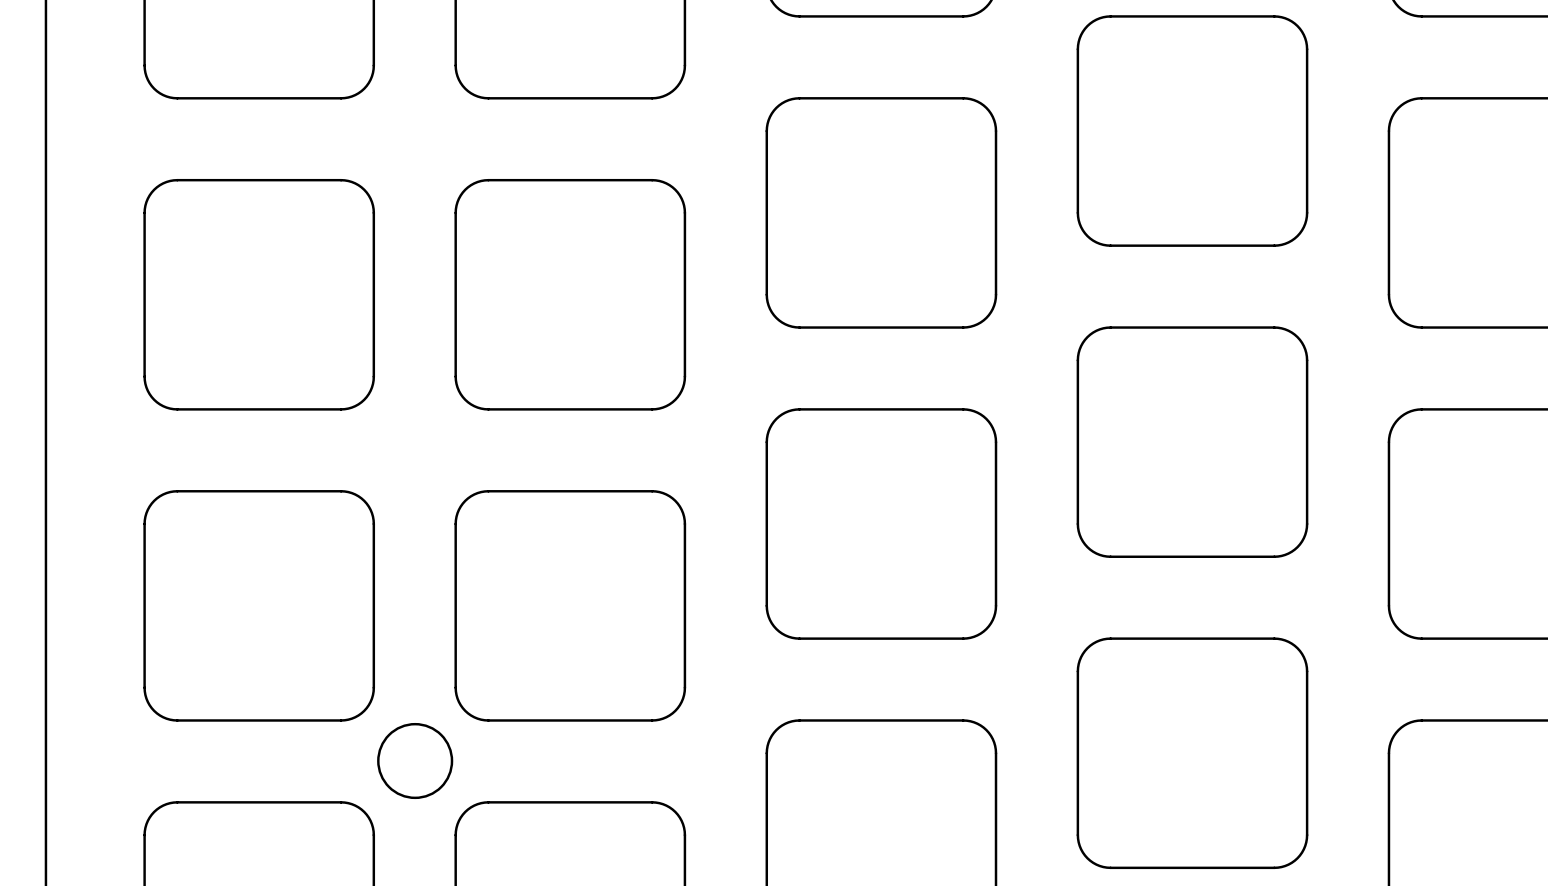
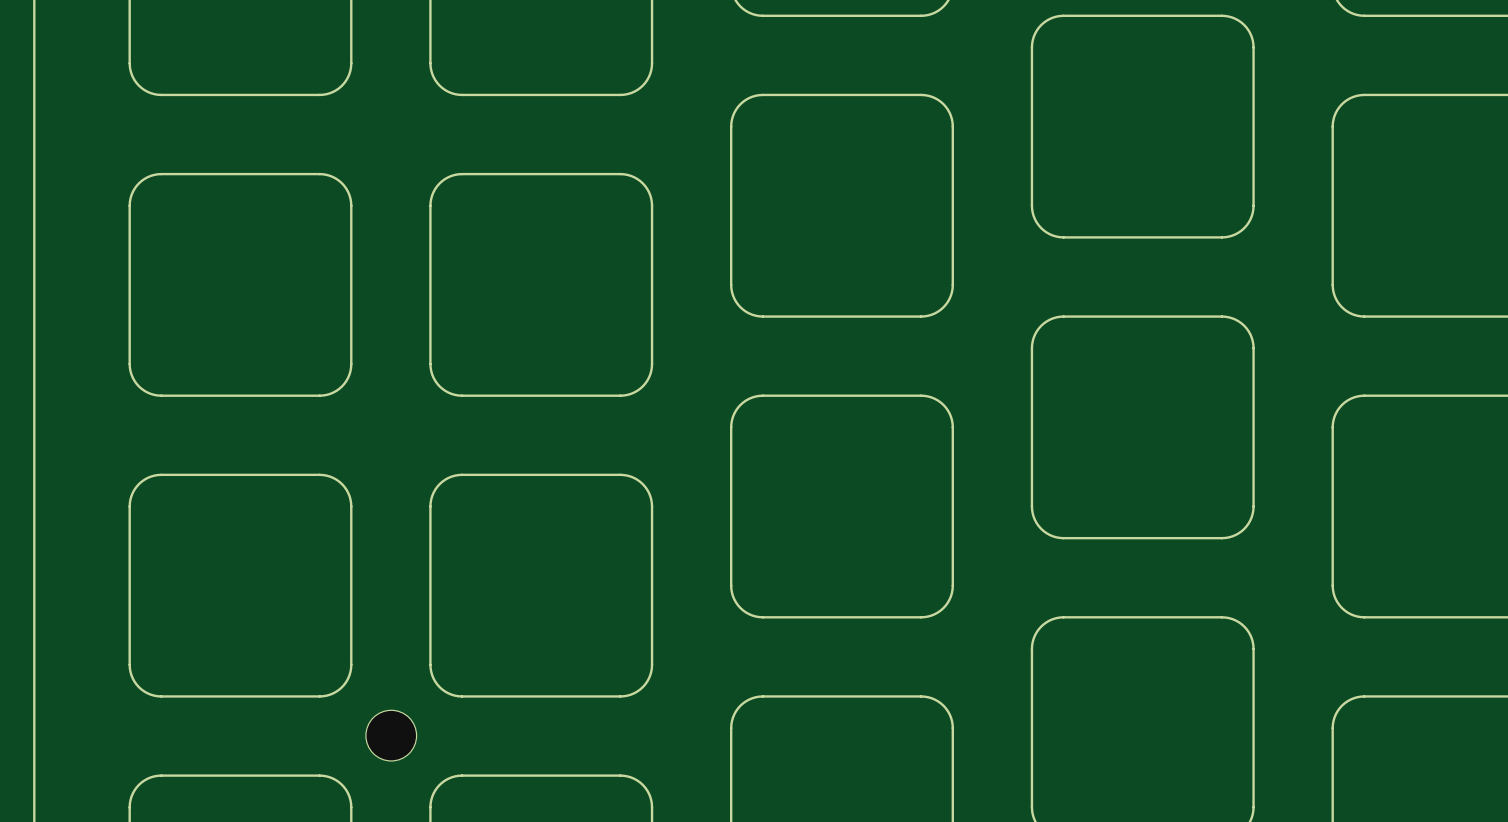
round board edge: [377, 722, 454, 800] -> none
part: none -> (391, 735)

